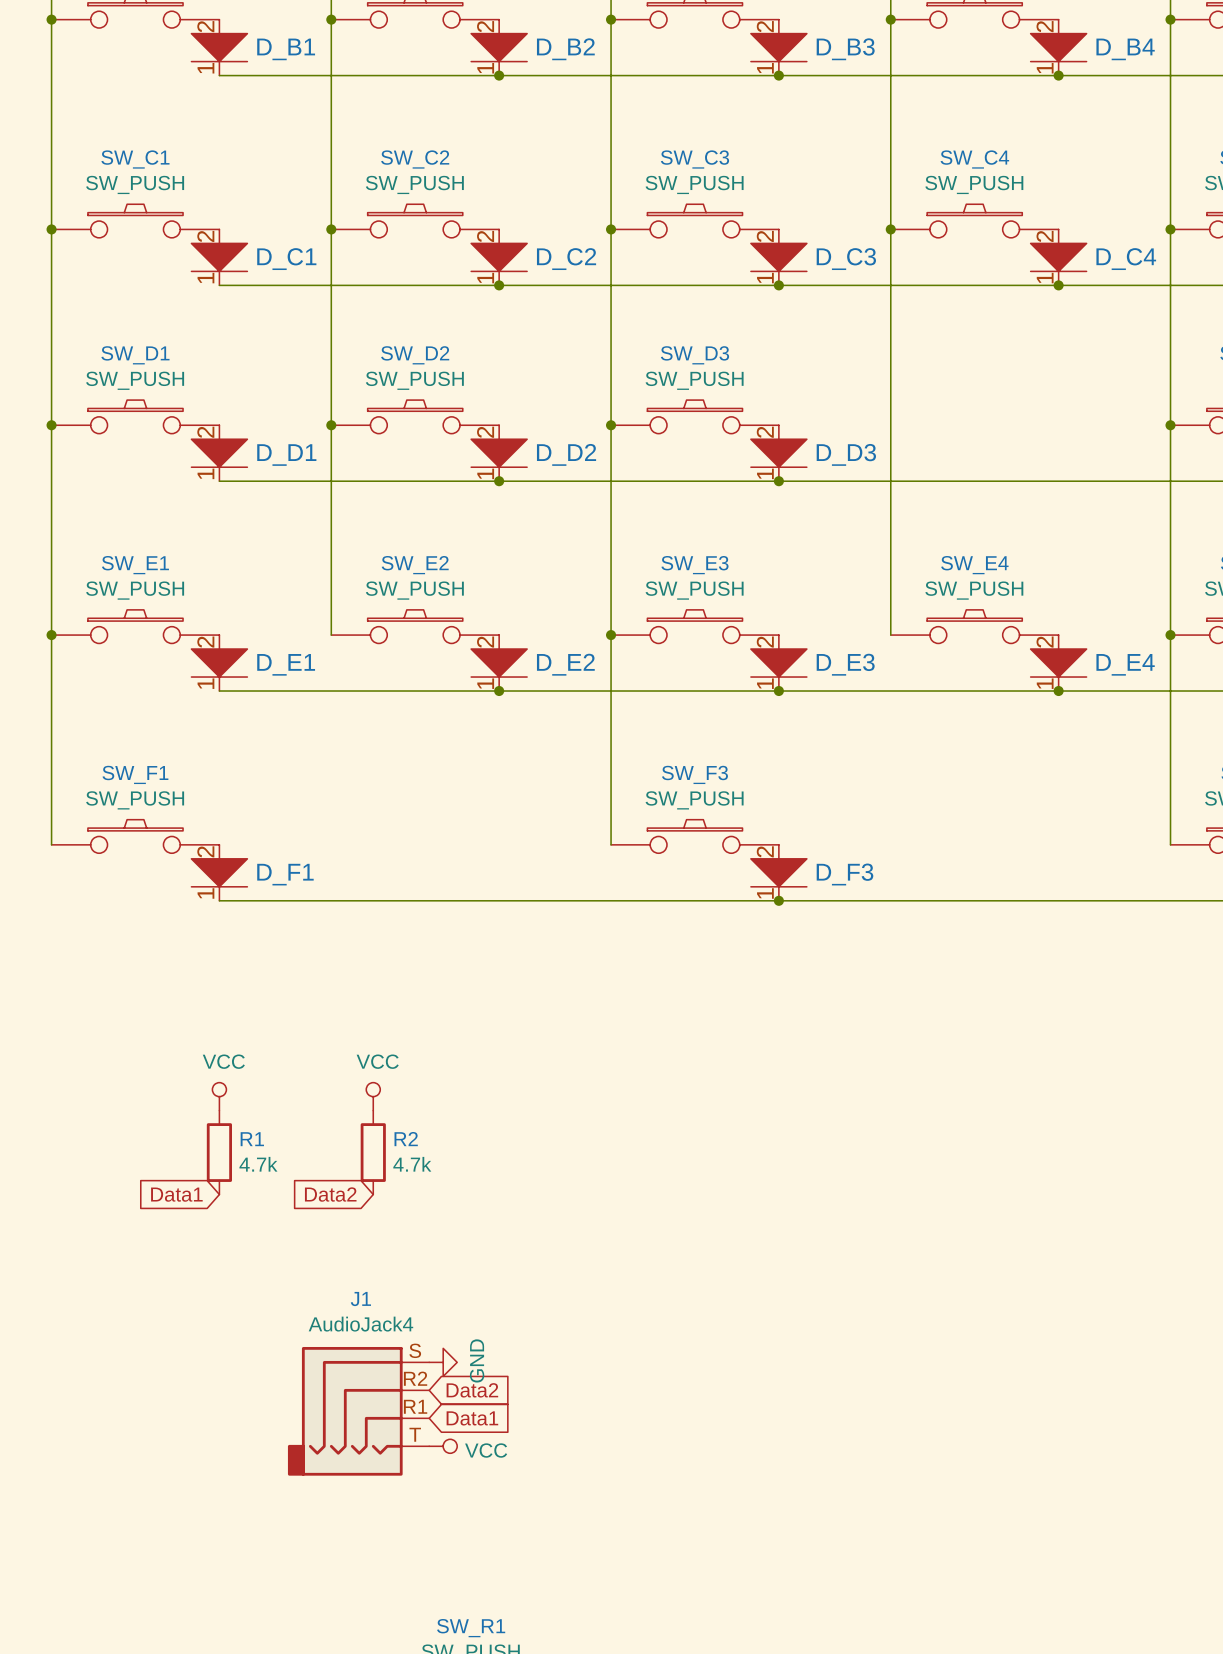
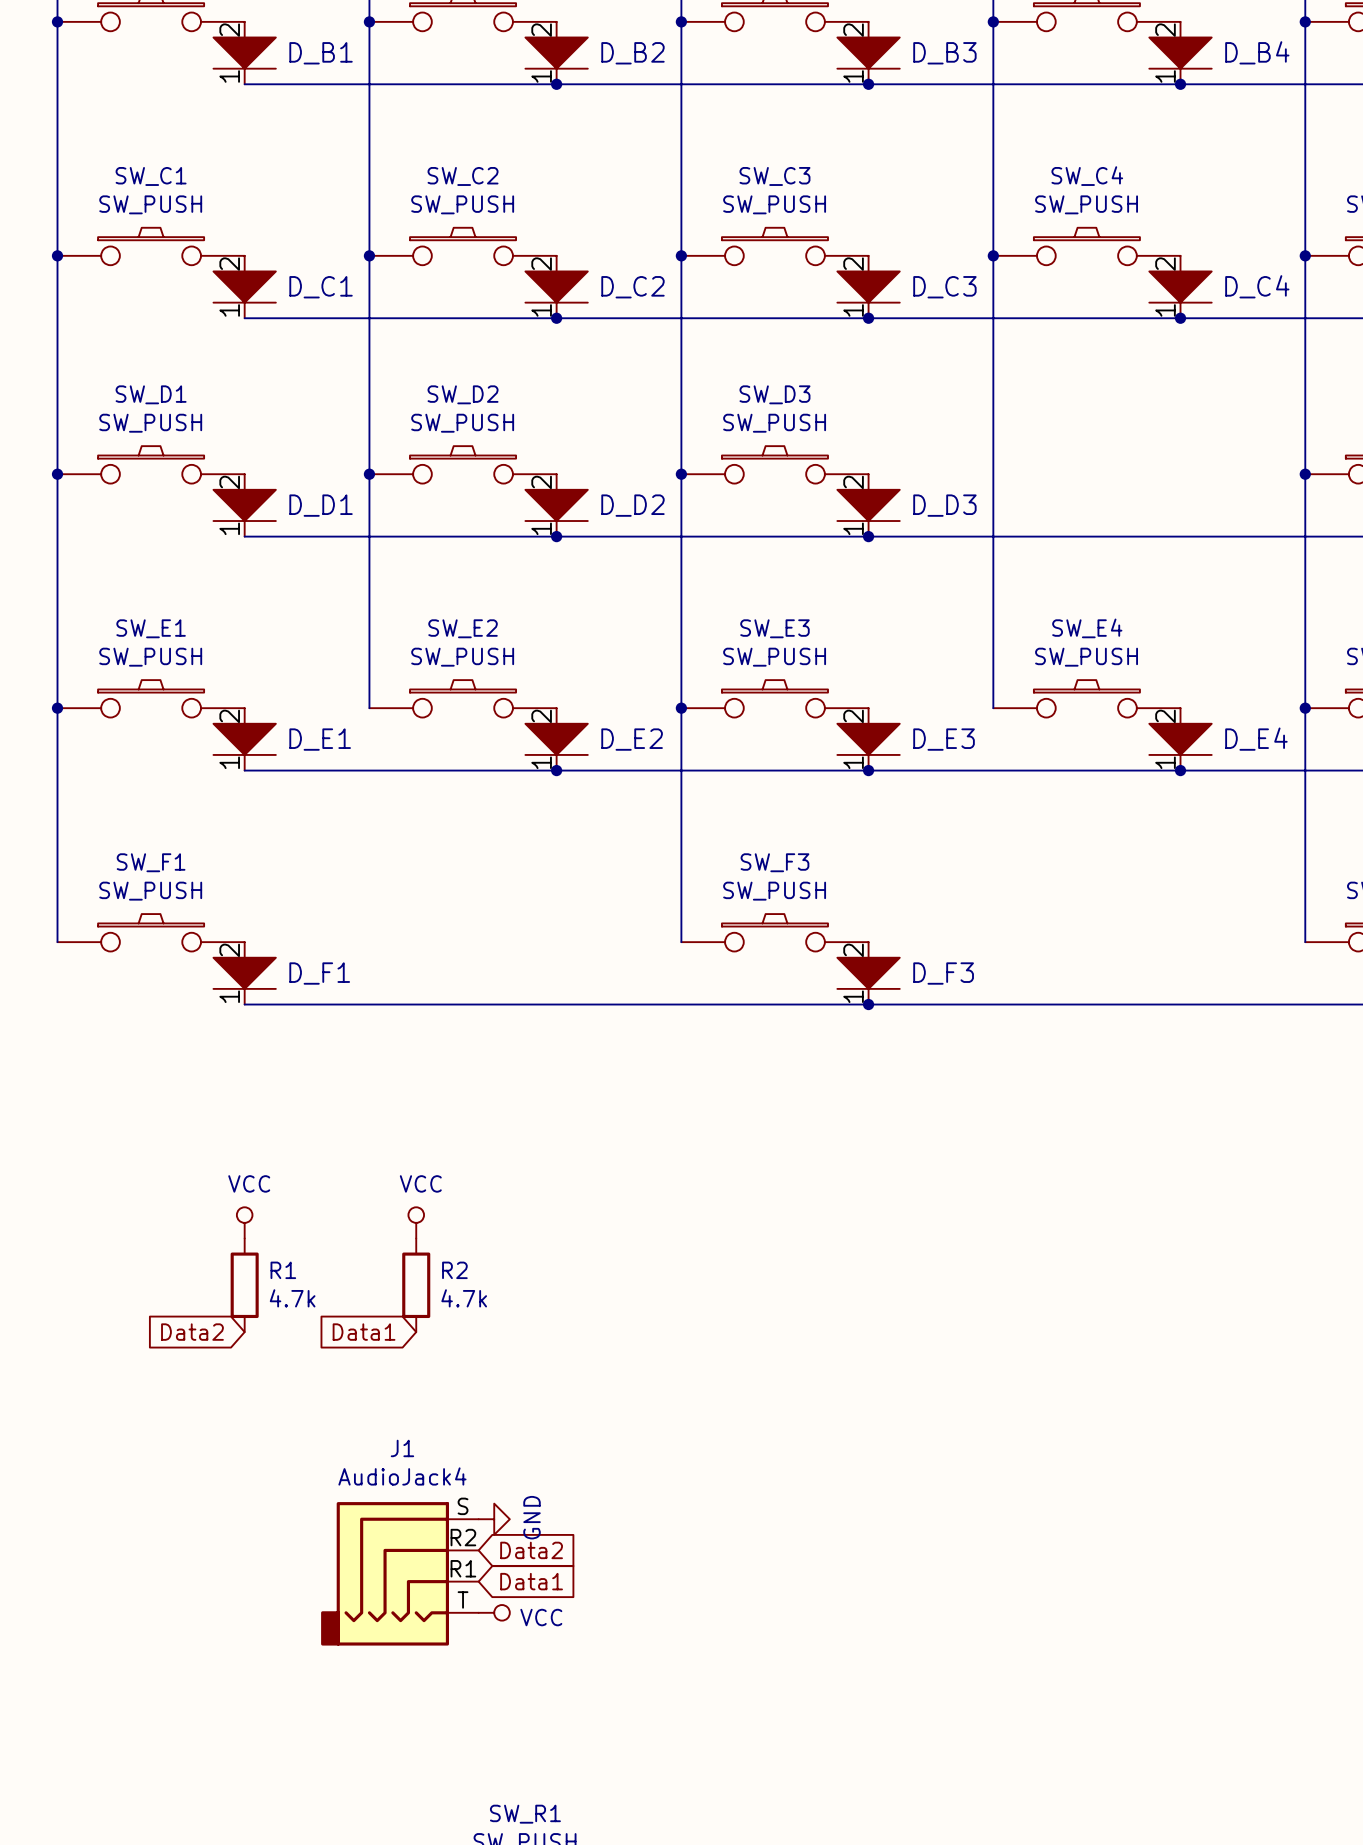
global label: Data1 (176, 1194) -> Data2 (192, 1332)
global label: Data2 (330, 1194) -> Data1 (364, 1332)

